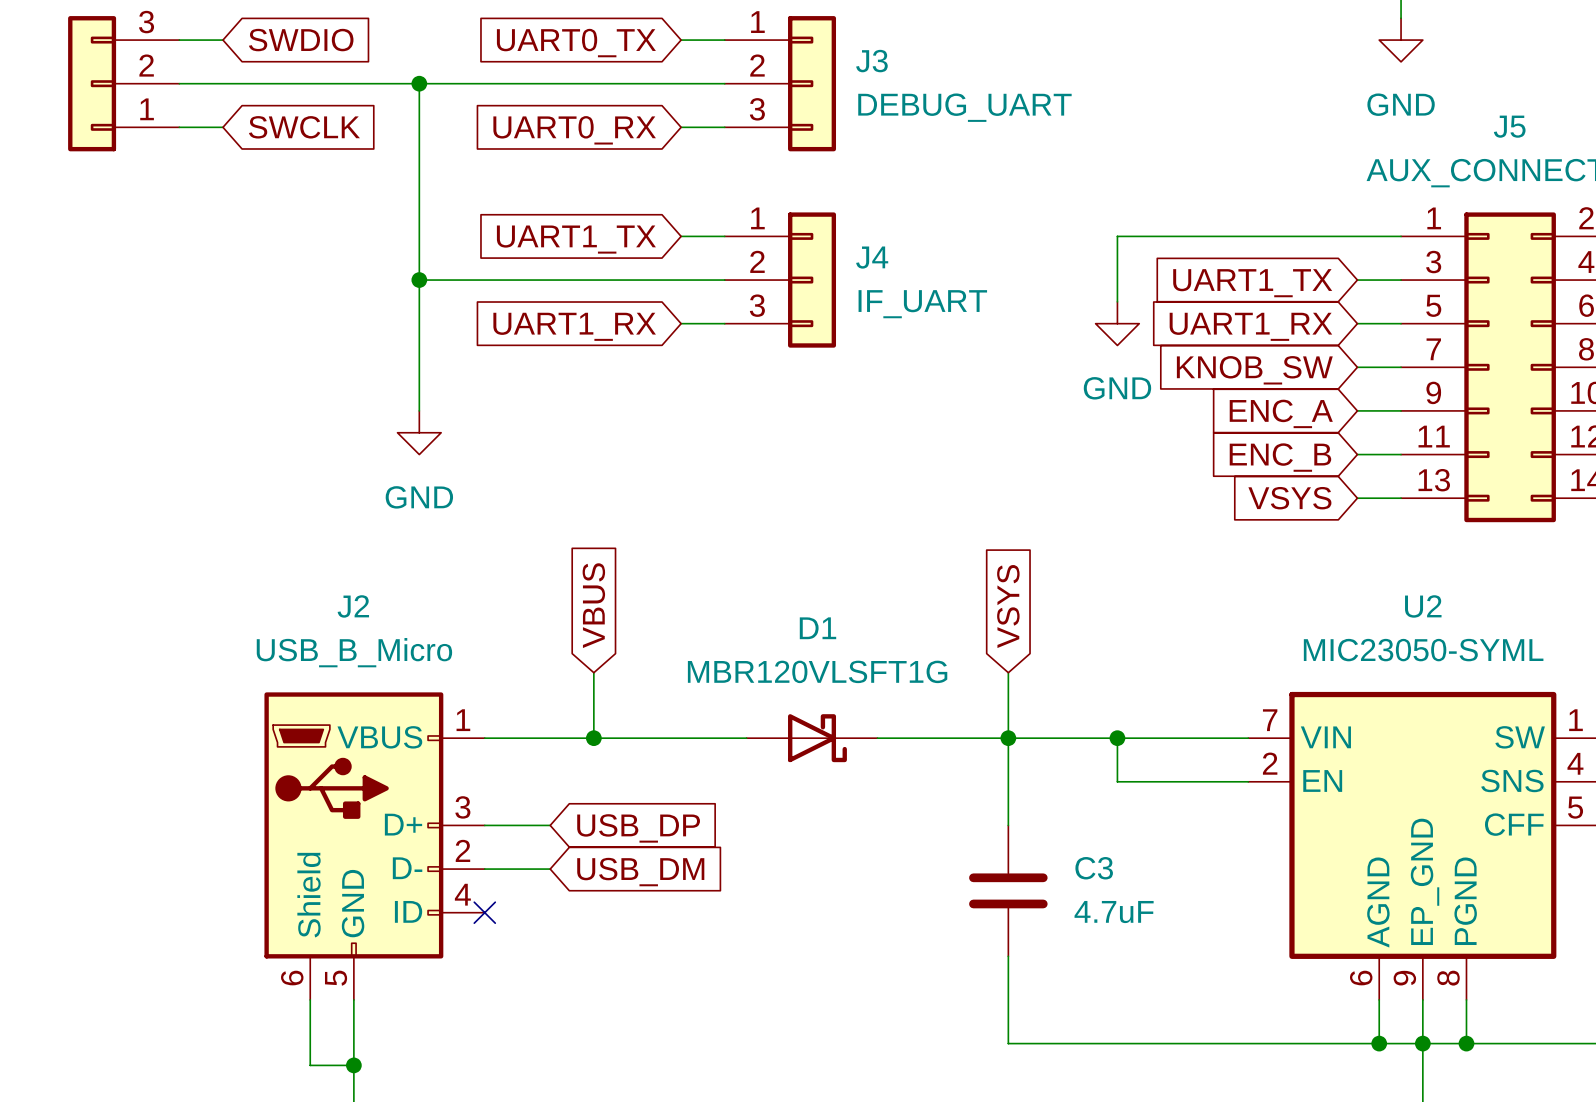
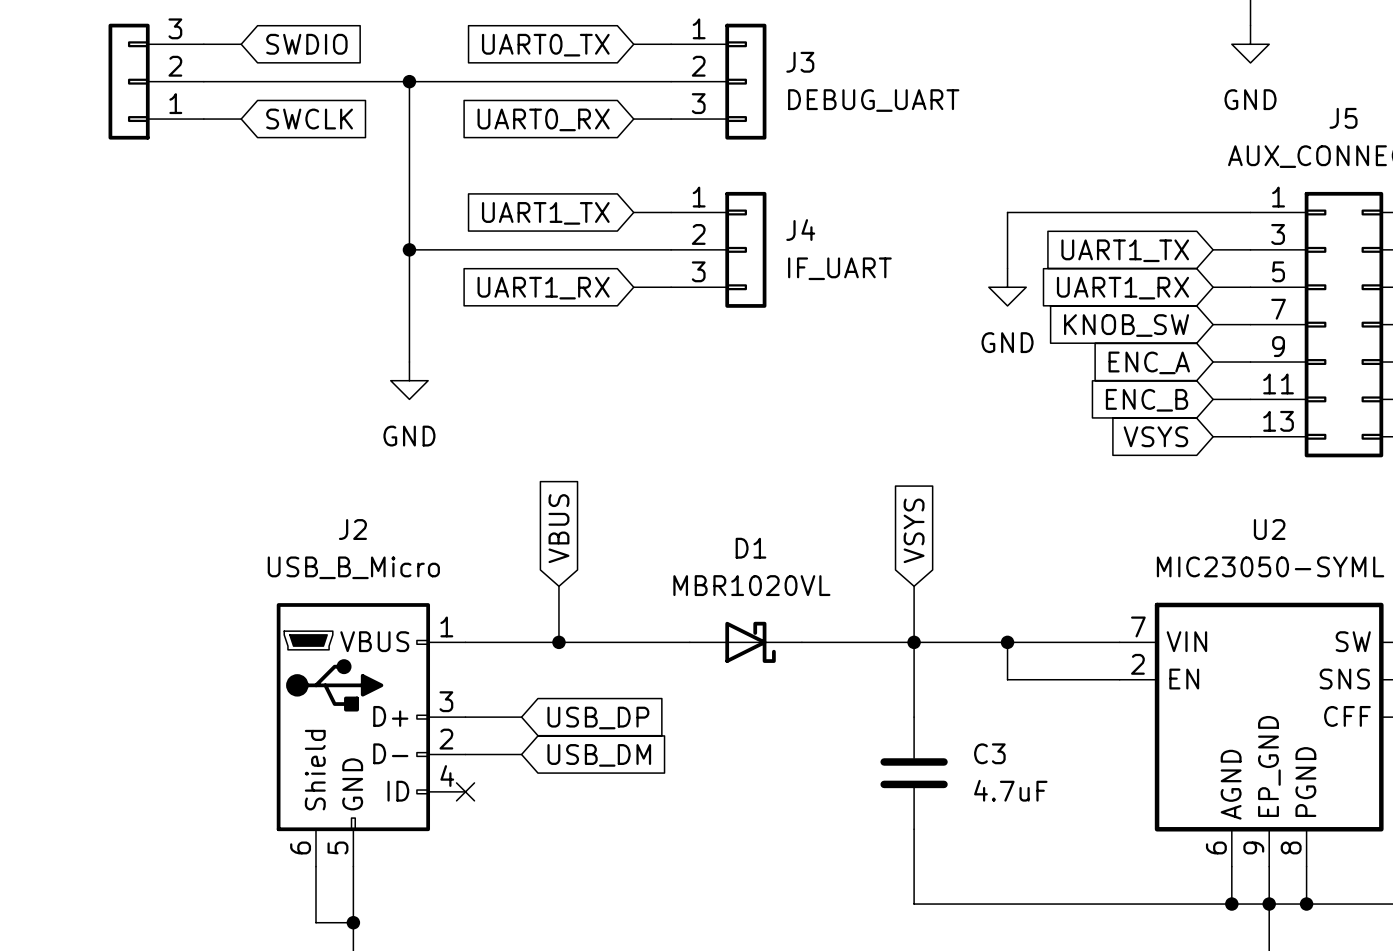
D1 value: MBR120VLSFT1G (817, 671) -> MBR1020VL (751, 585)

